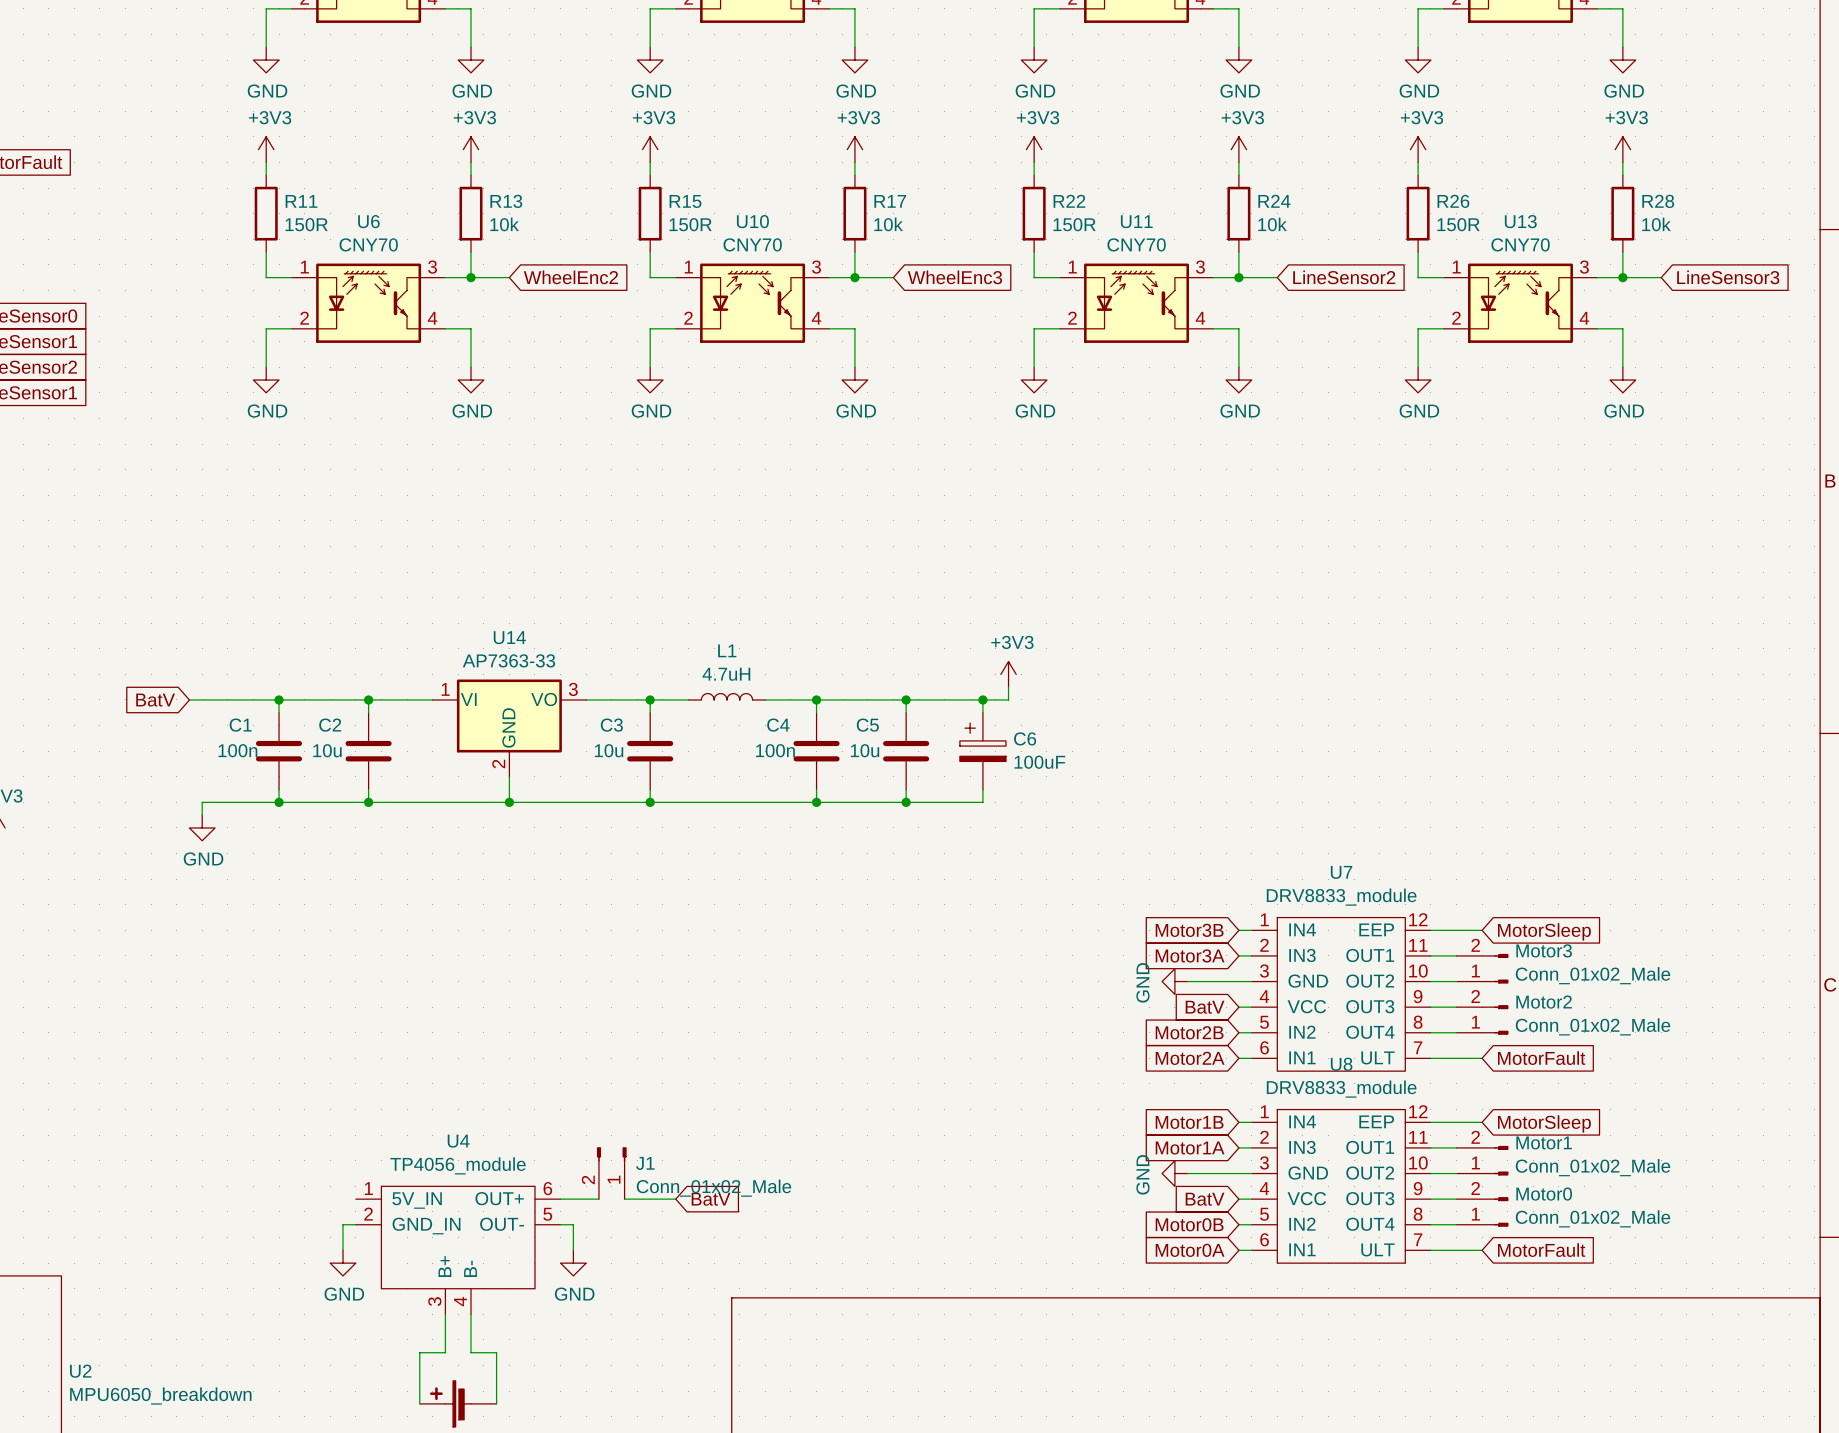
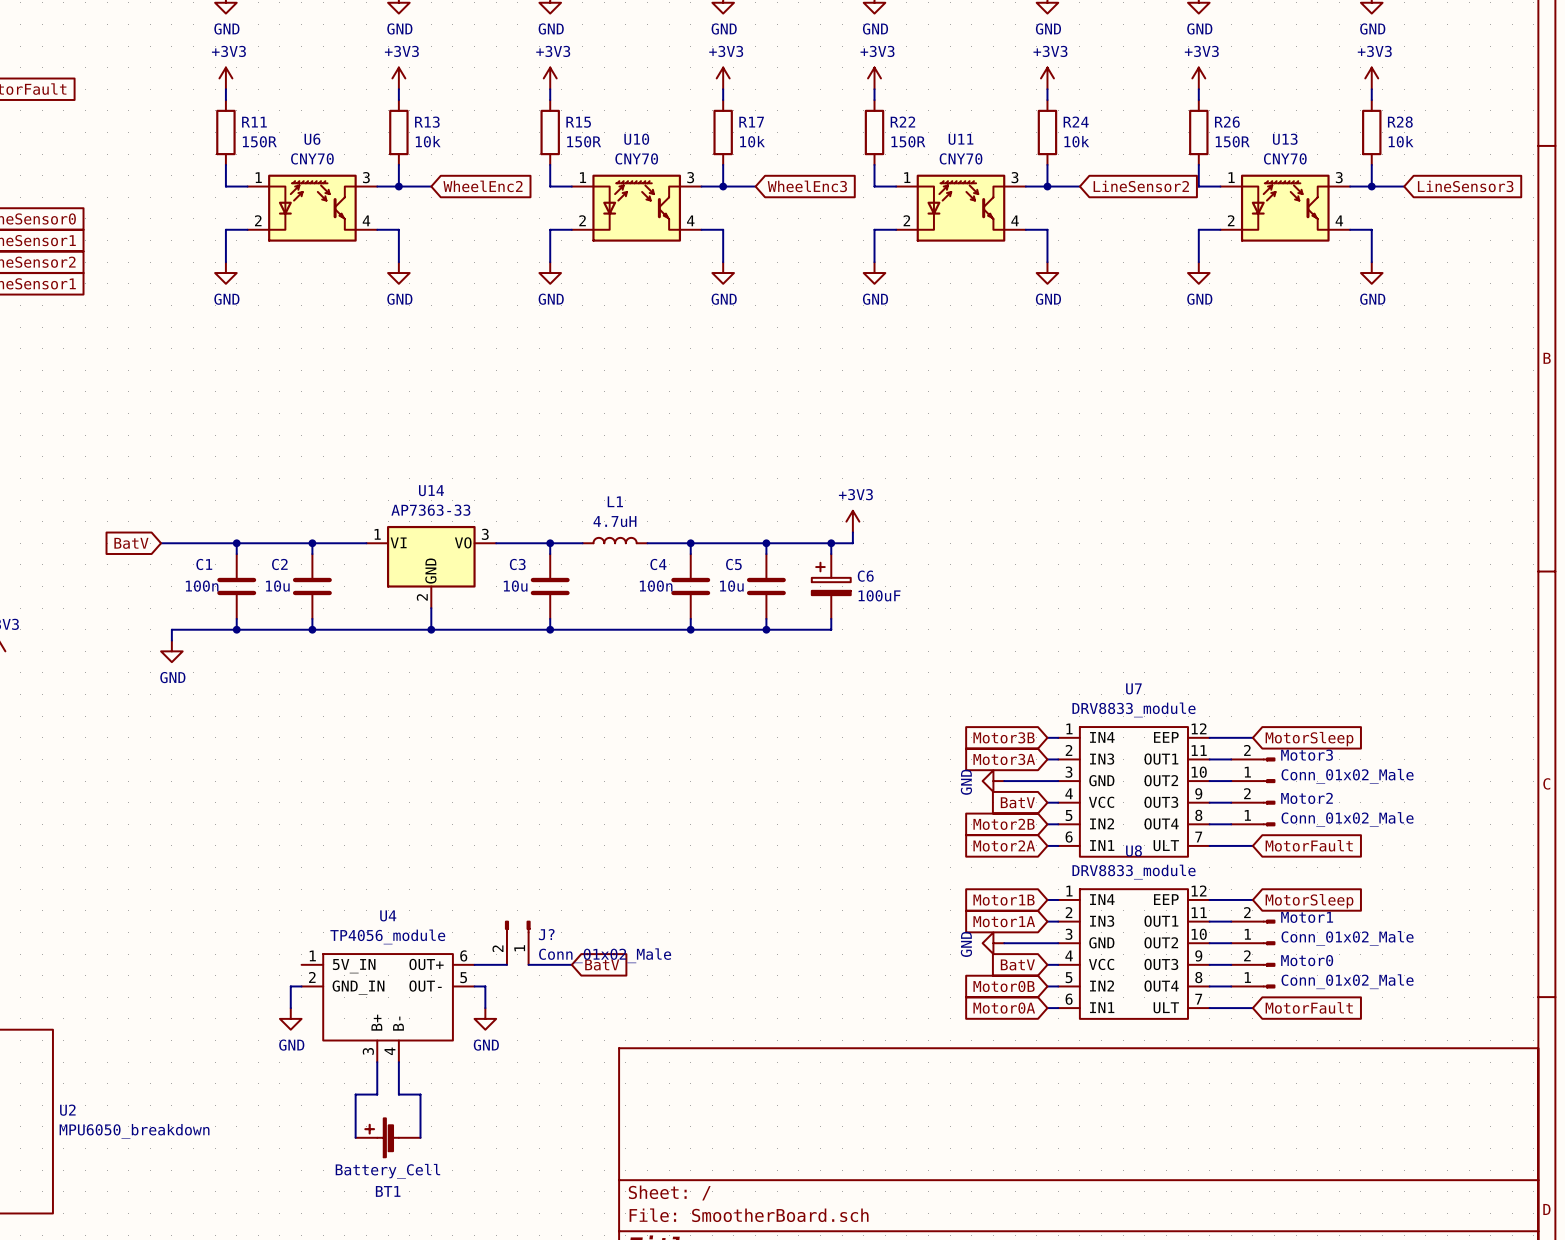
J1 name: J1 (645, 1163) -> J? (546, 934)

